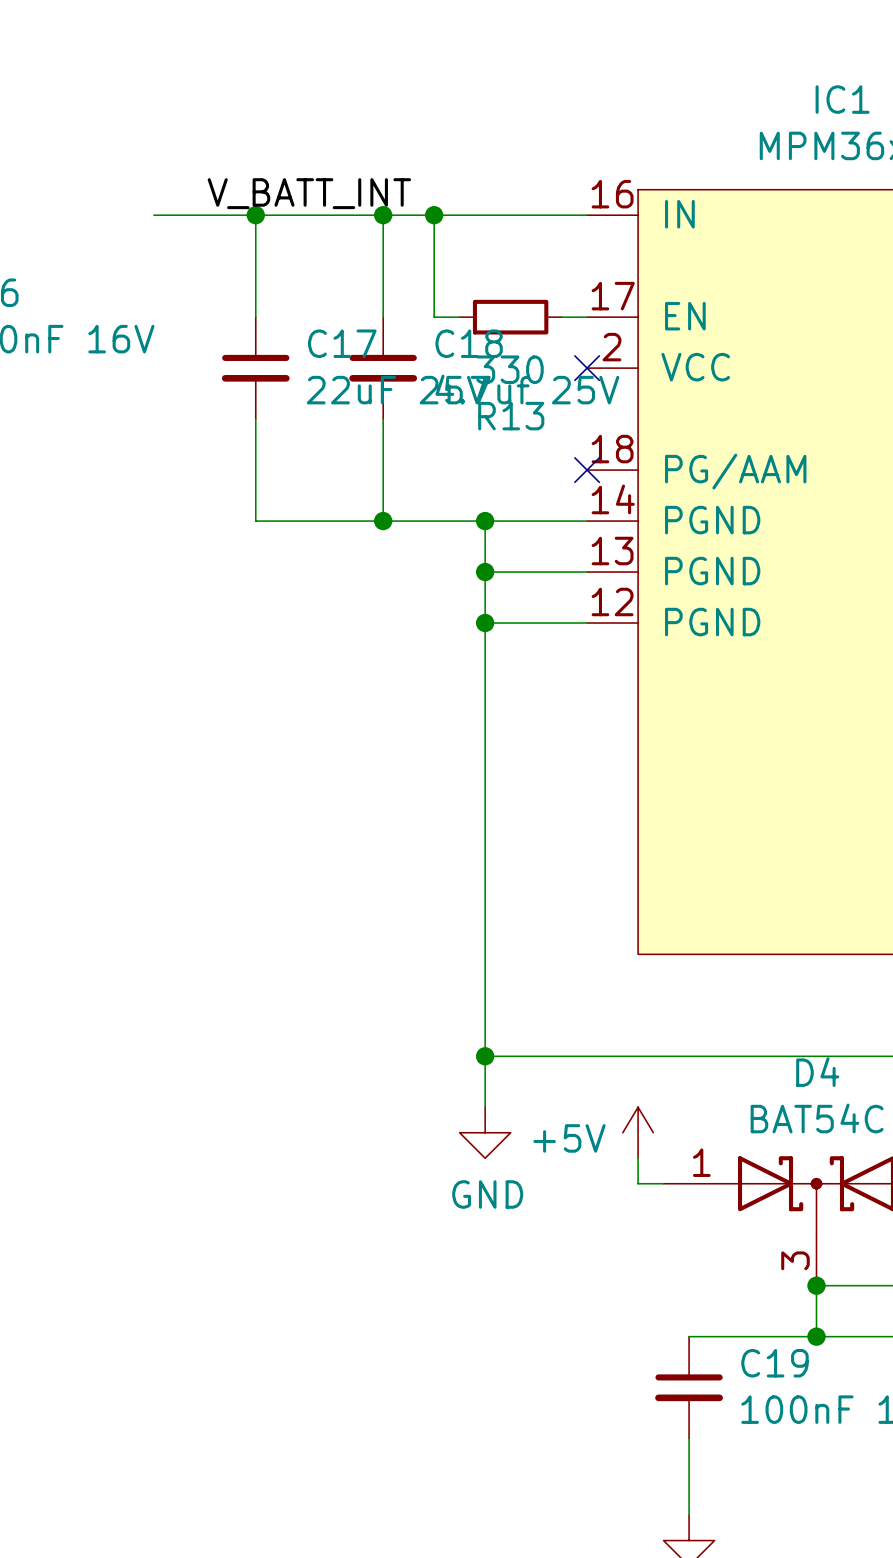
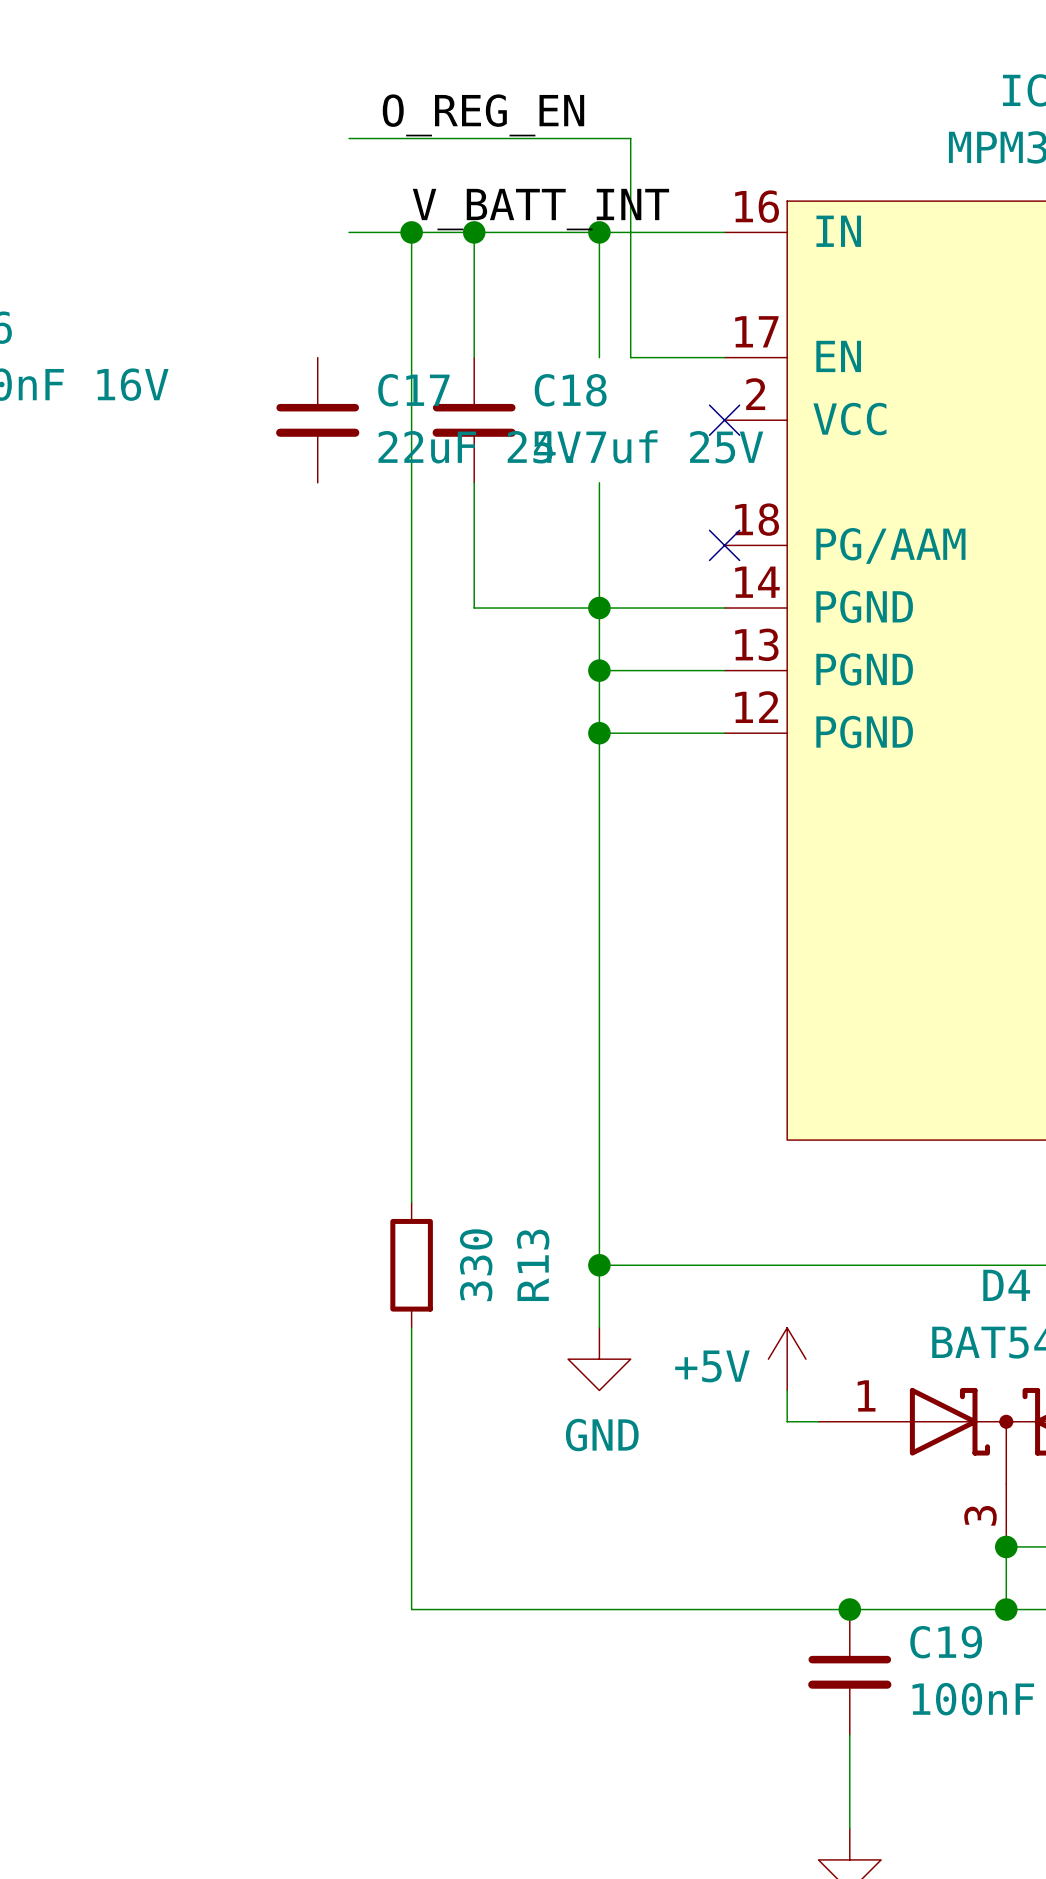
label: none -> O_REG_EN (483, 115)
wire: none -> (349, 138) (630, 138) (630, 357) (693, 357)
label position: V_BATT_INT (309, 193) -> V_BATT_INT (540, 209)
wire: (153, 215) (281, 215) -> none
wire: (255, 215) (255, 317) -> (599, 232) (599, 357)
junction: (255, 215) -> none
wire: none -> (411, 232) (411, 1202)
junction: none -> (411, 232)
wire: (434, 215) (434, 317) (459, 317) -> none
junction: (434, 215) -> none
junction: none -> (599, 232)
R13 rotation: 0° (510, 317) -> 90° clockwise (411, 1265)
R13 position: (510, 317) -> (411, 1265)
R13 value position: 330 (510, 369) -> 330 (476, 1265)
R13 name position: R13 (511, 416) -> R13 (533, 1265)
wire: (255, 419) (255, 521) (383, 521) -> none
wire: none -> (599, 482) (599, 608)
junction: (383, 521) -> none
wire: none -> (411, 1327) (411, 1609) (849, 1609)
junction: none -> (849, 1609)

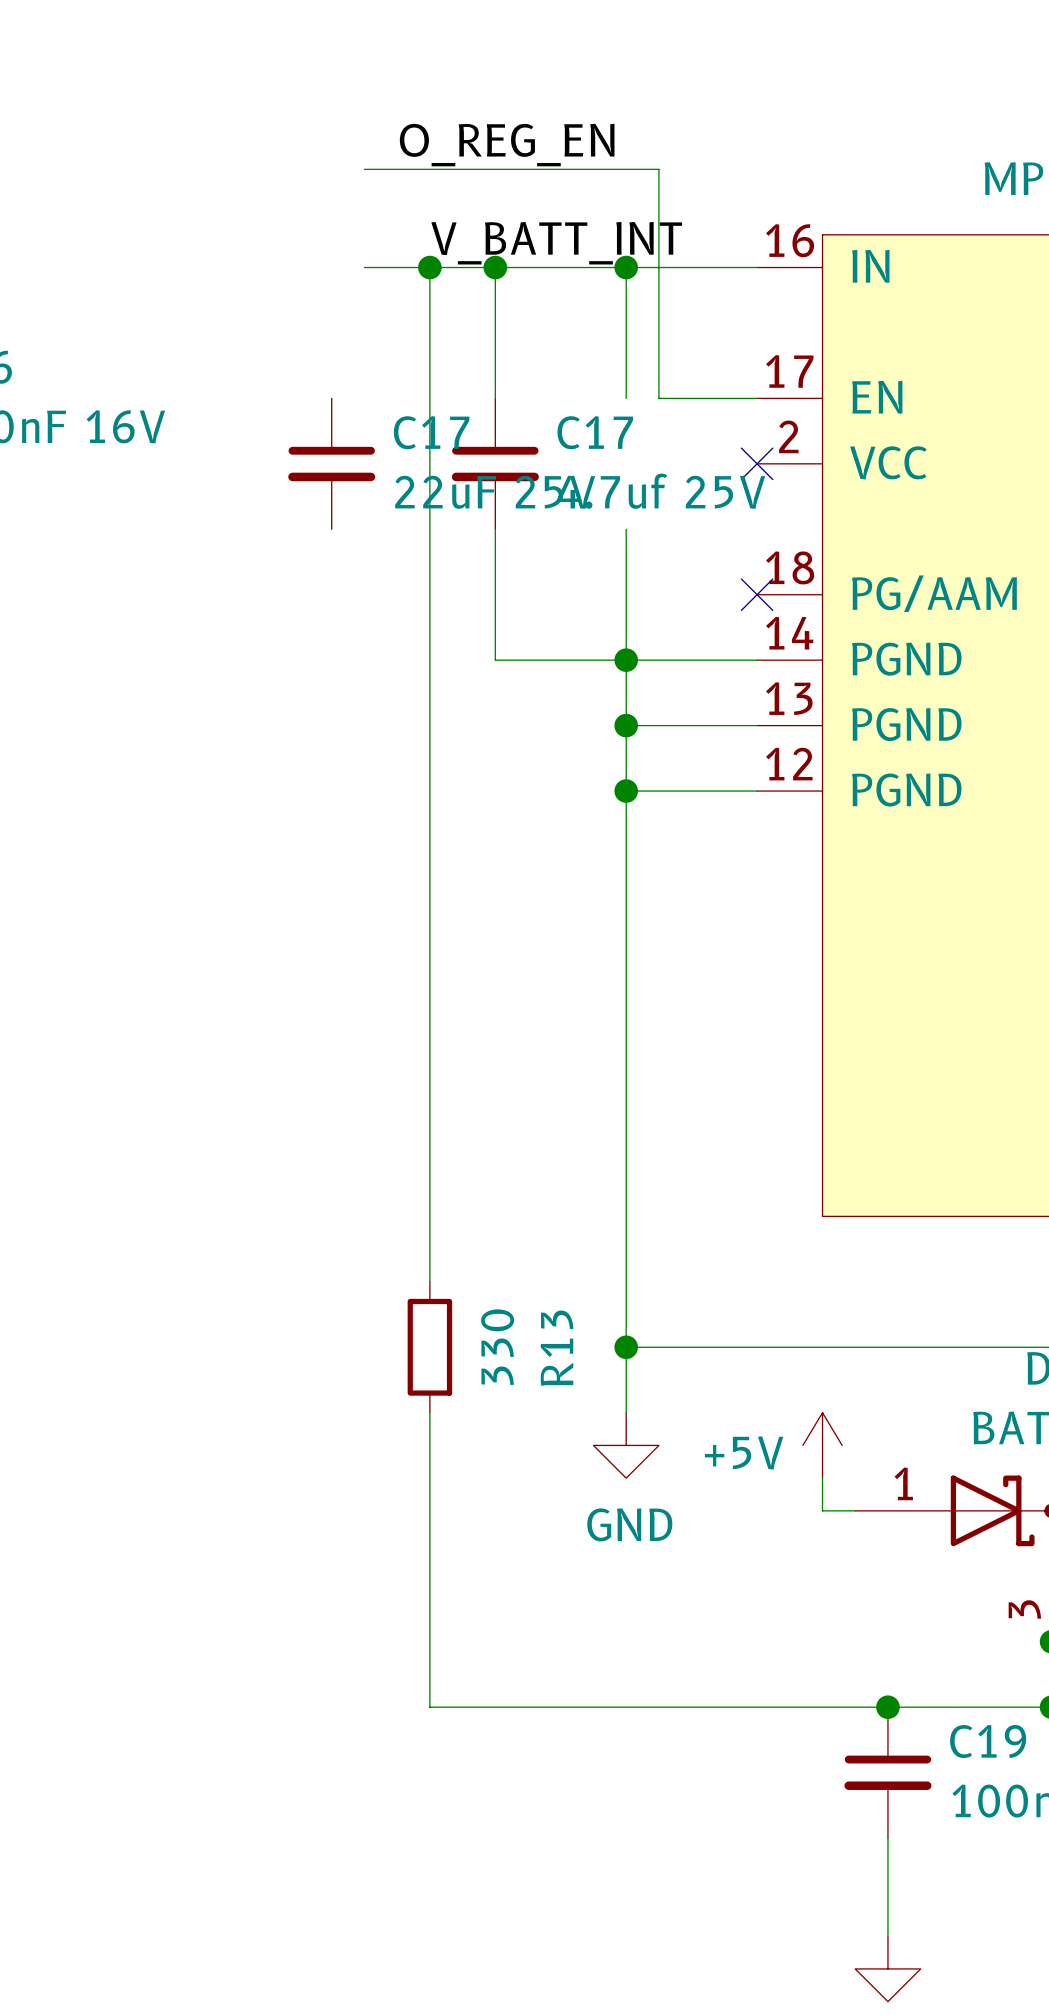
C18 name: C18 (570, 390) -> C17 (595, 432)

